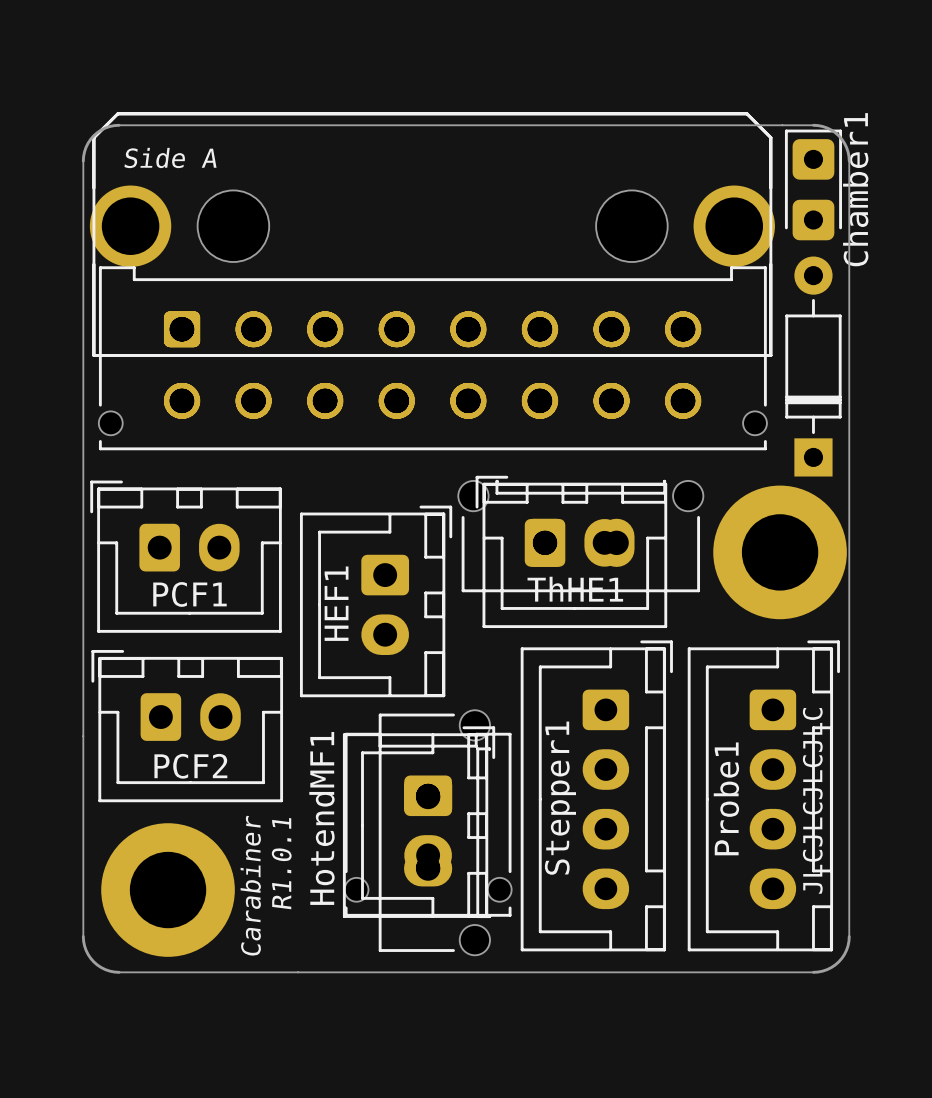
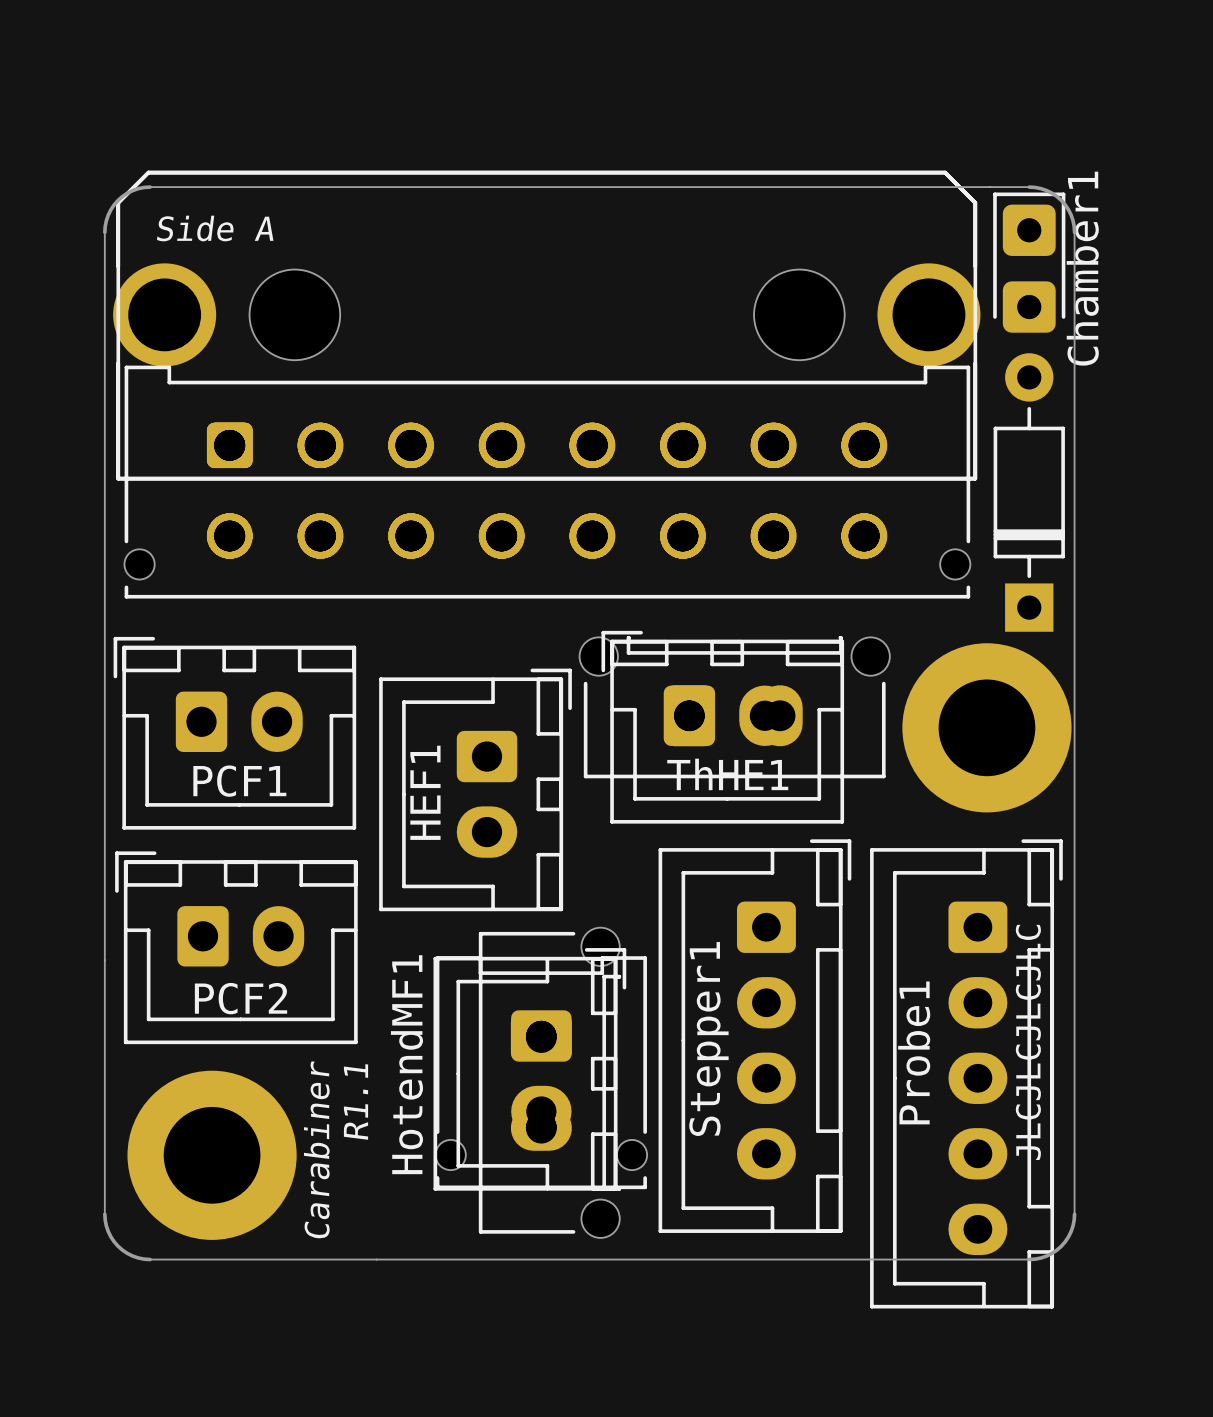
Probe1 footprint: [687, 640, 840, 952] -> [870, 839, 1063, 1309]
text: R1.0.1 (281, 863) -> R1.1 (356, 1101)

